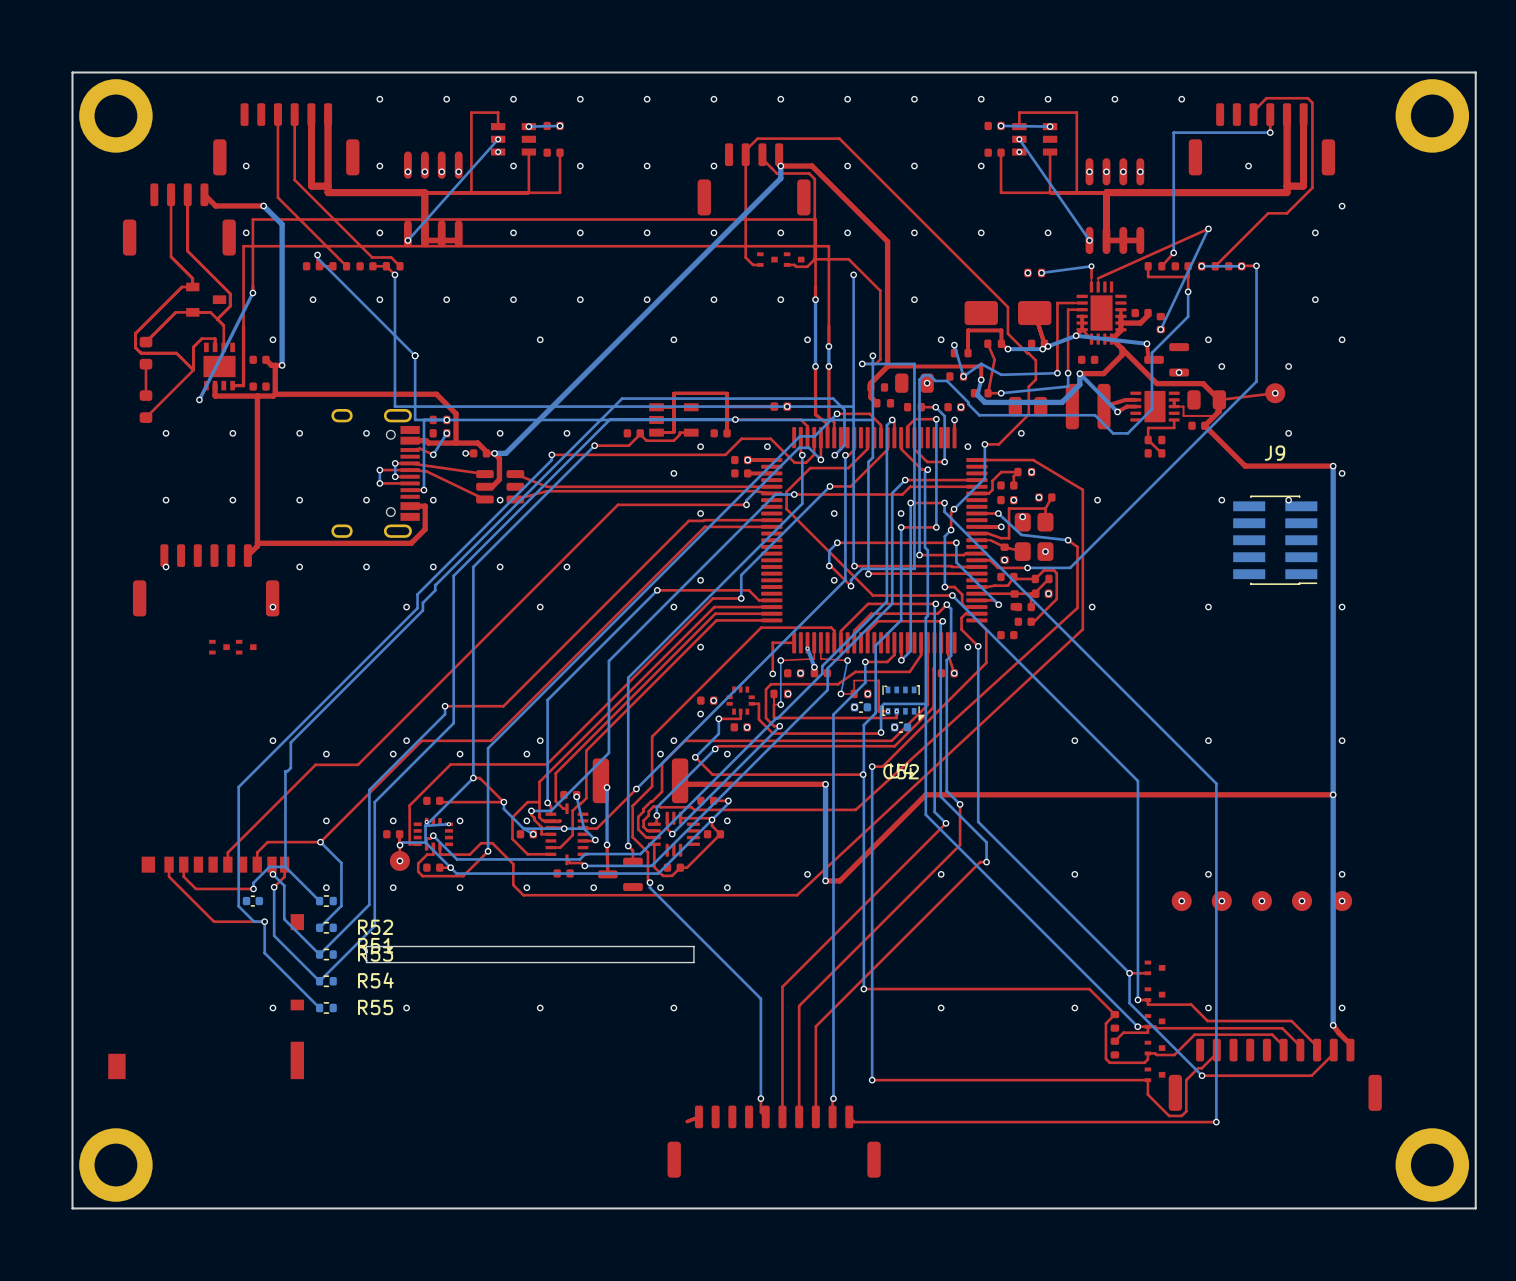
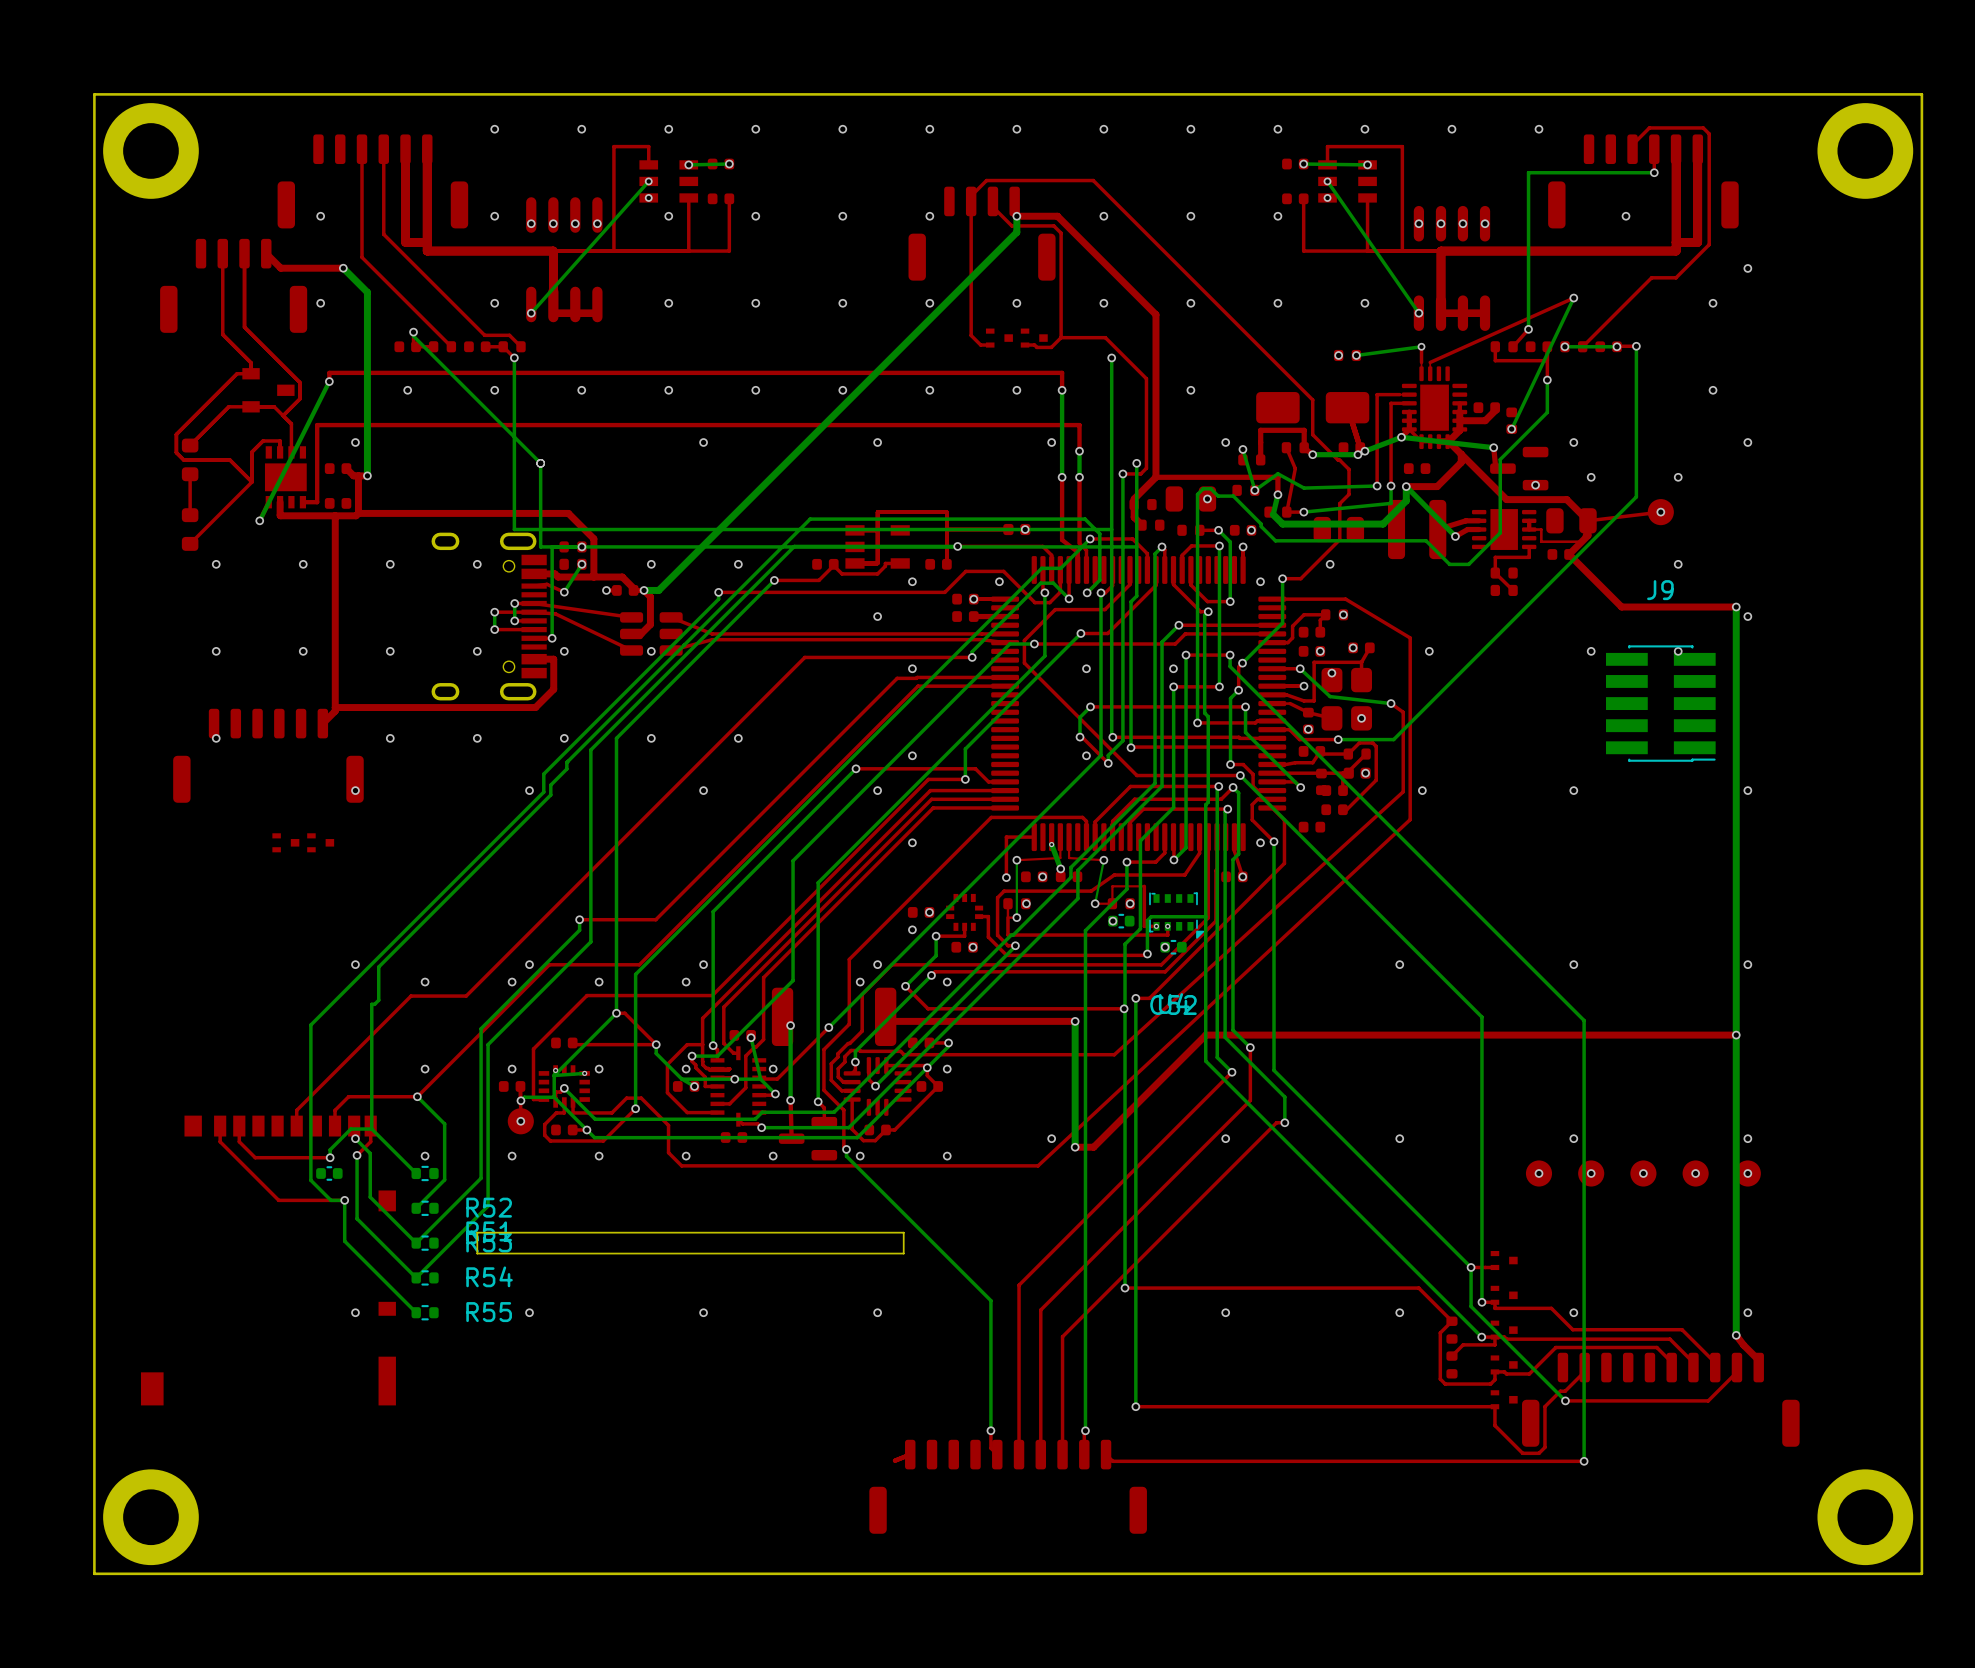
top track: (815, 286) (815, 219) (252, 219) (252, 286) -> (1062, 372) (329, 372)
top track: (828, 326) (828, 246) (243, 246) (243, 326) -> (1079, 425) (317, 425)
bottom track: (862, 363) (914, 363) (914, 568) (862, 568) -> (1122, 473) (1122, 740)

